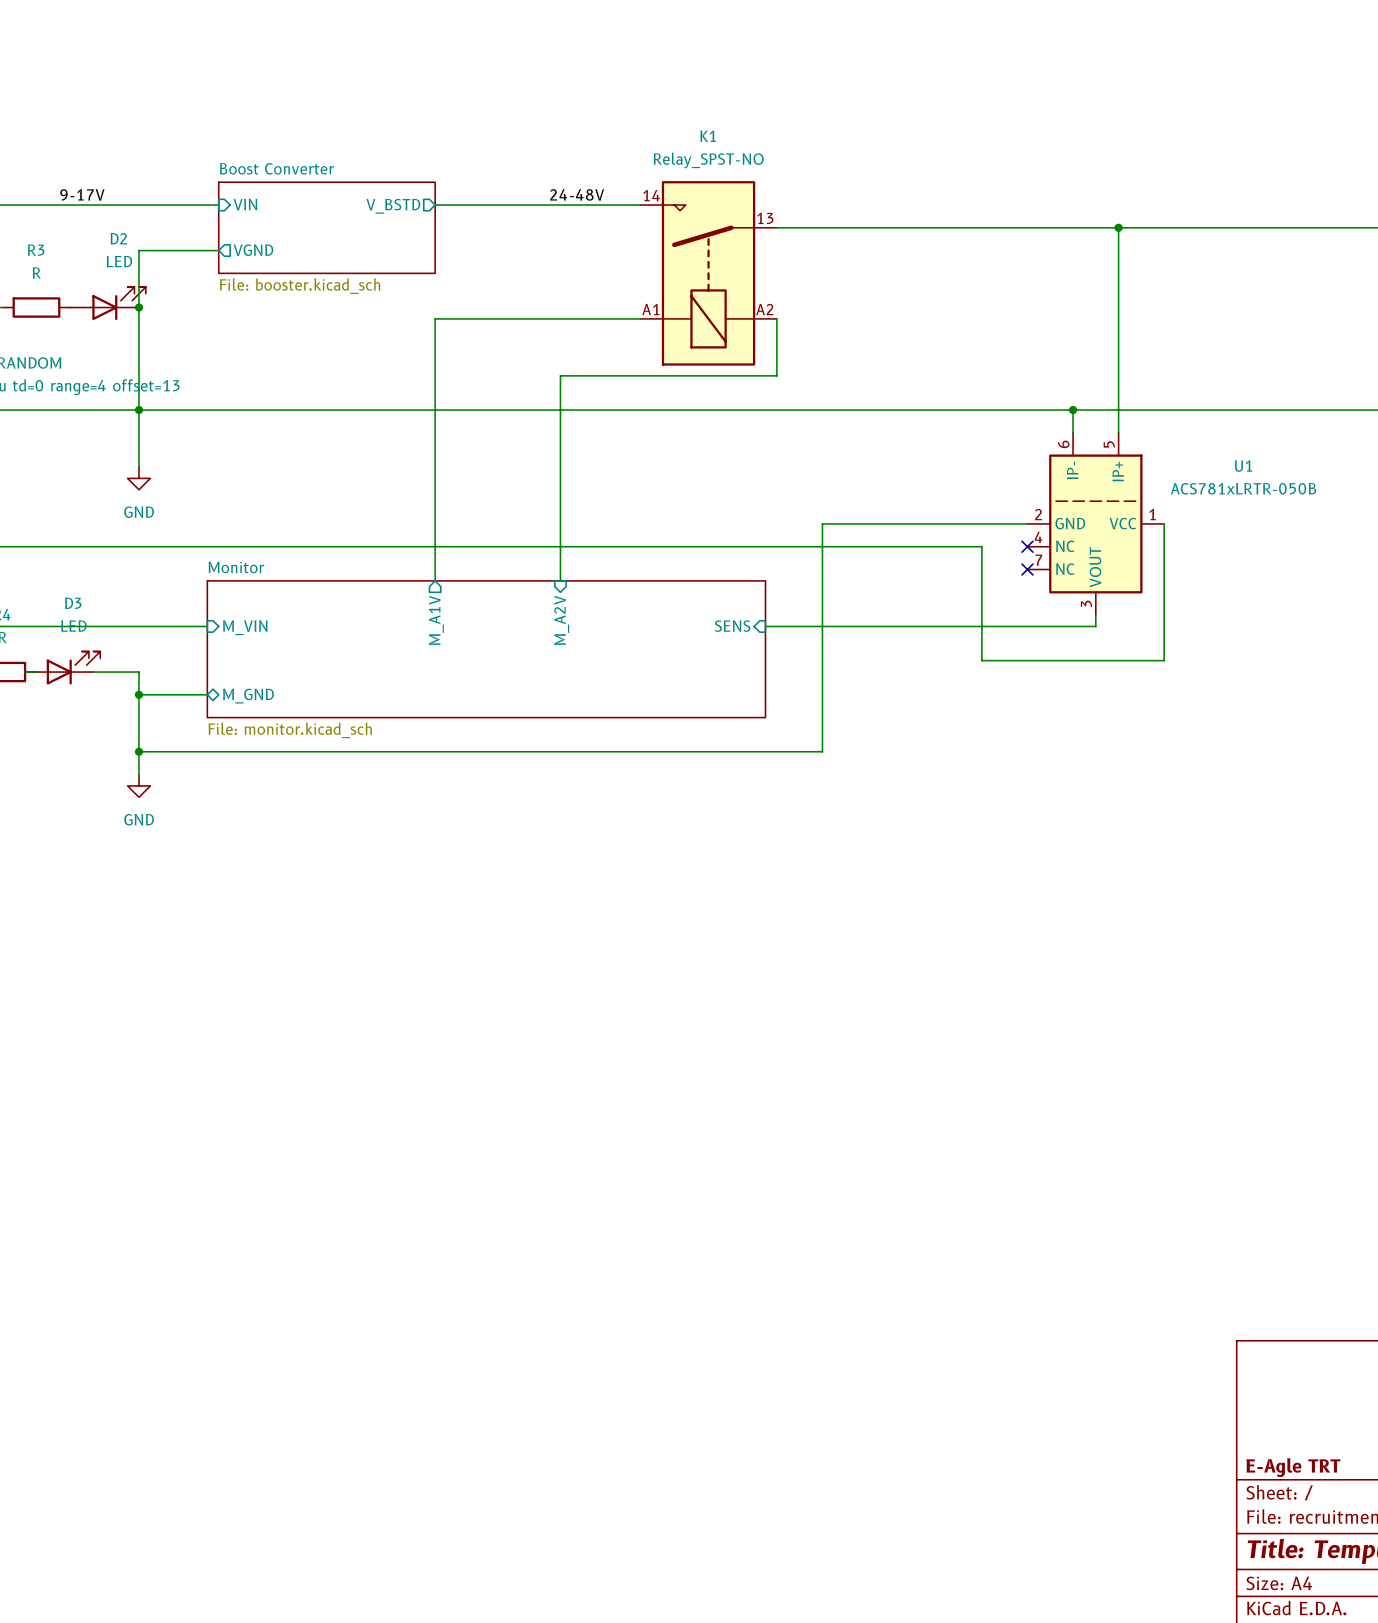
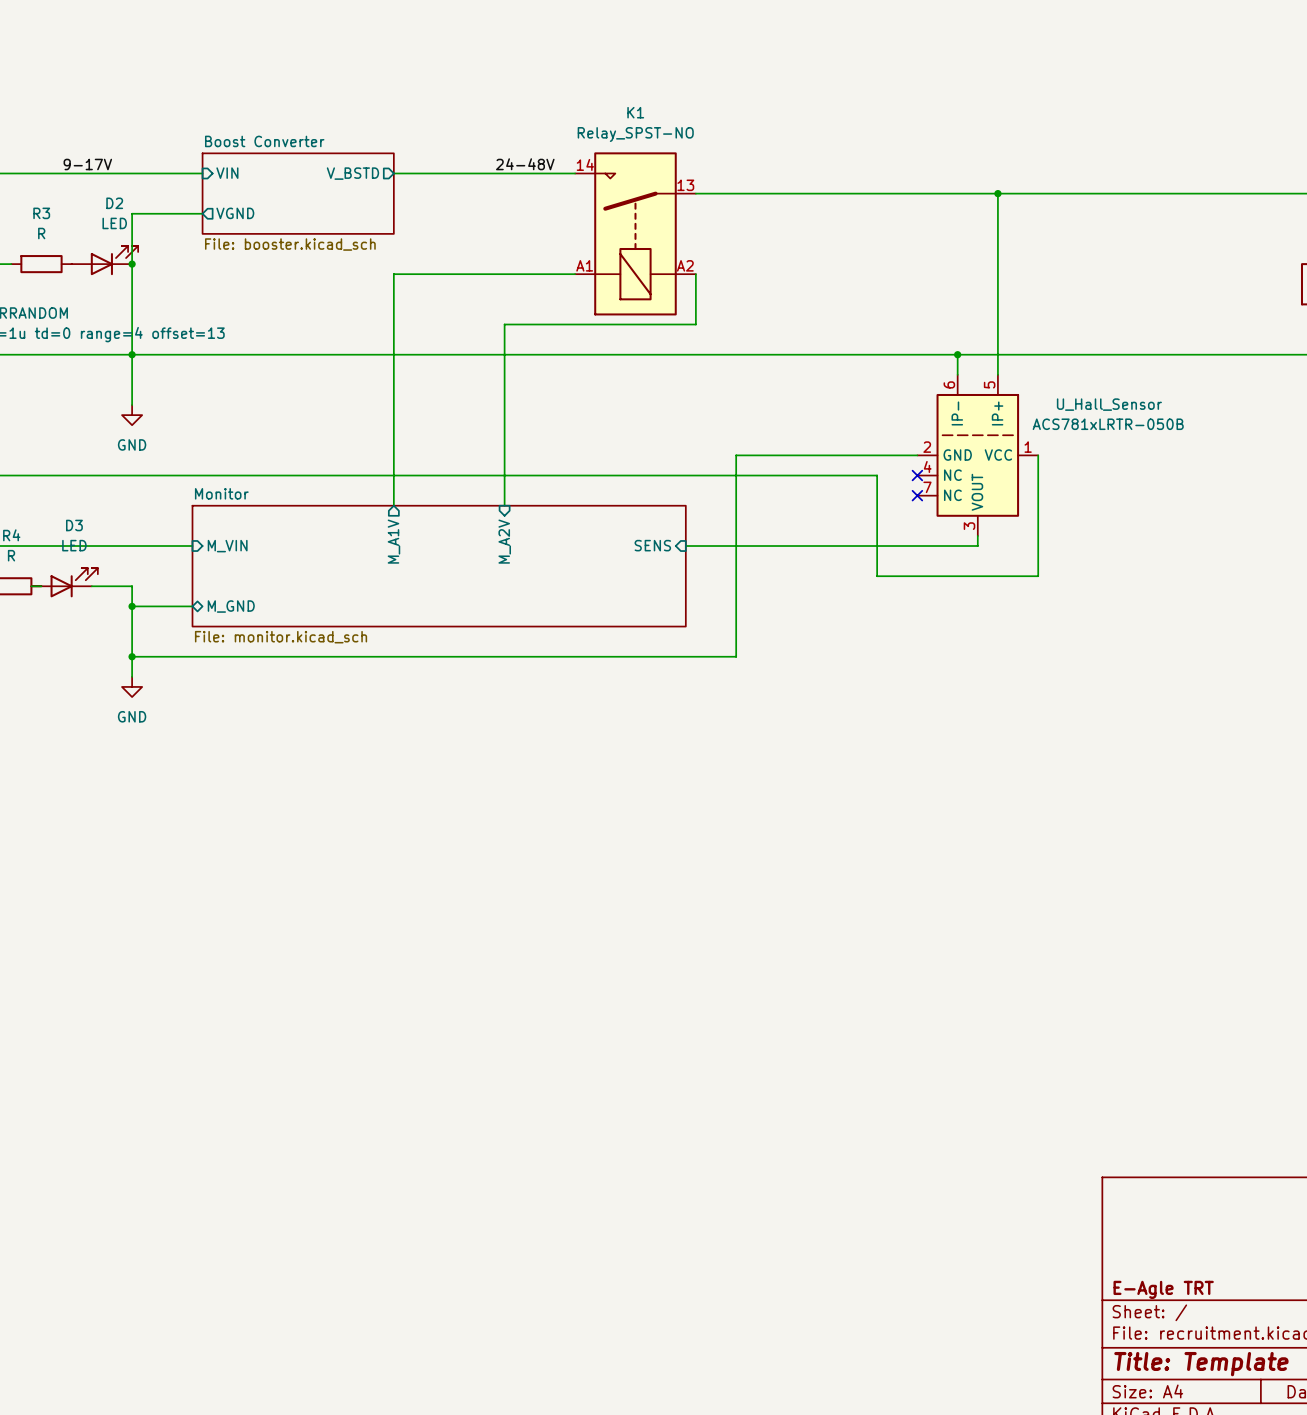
U1 name: U1 (1243, 466) -> U_Hall_Sensor (1109, 404)

